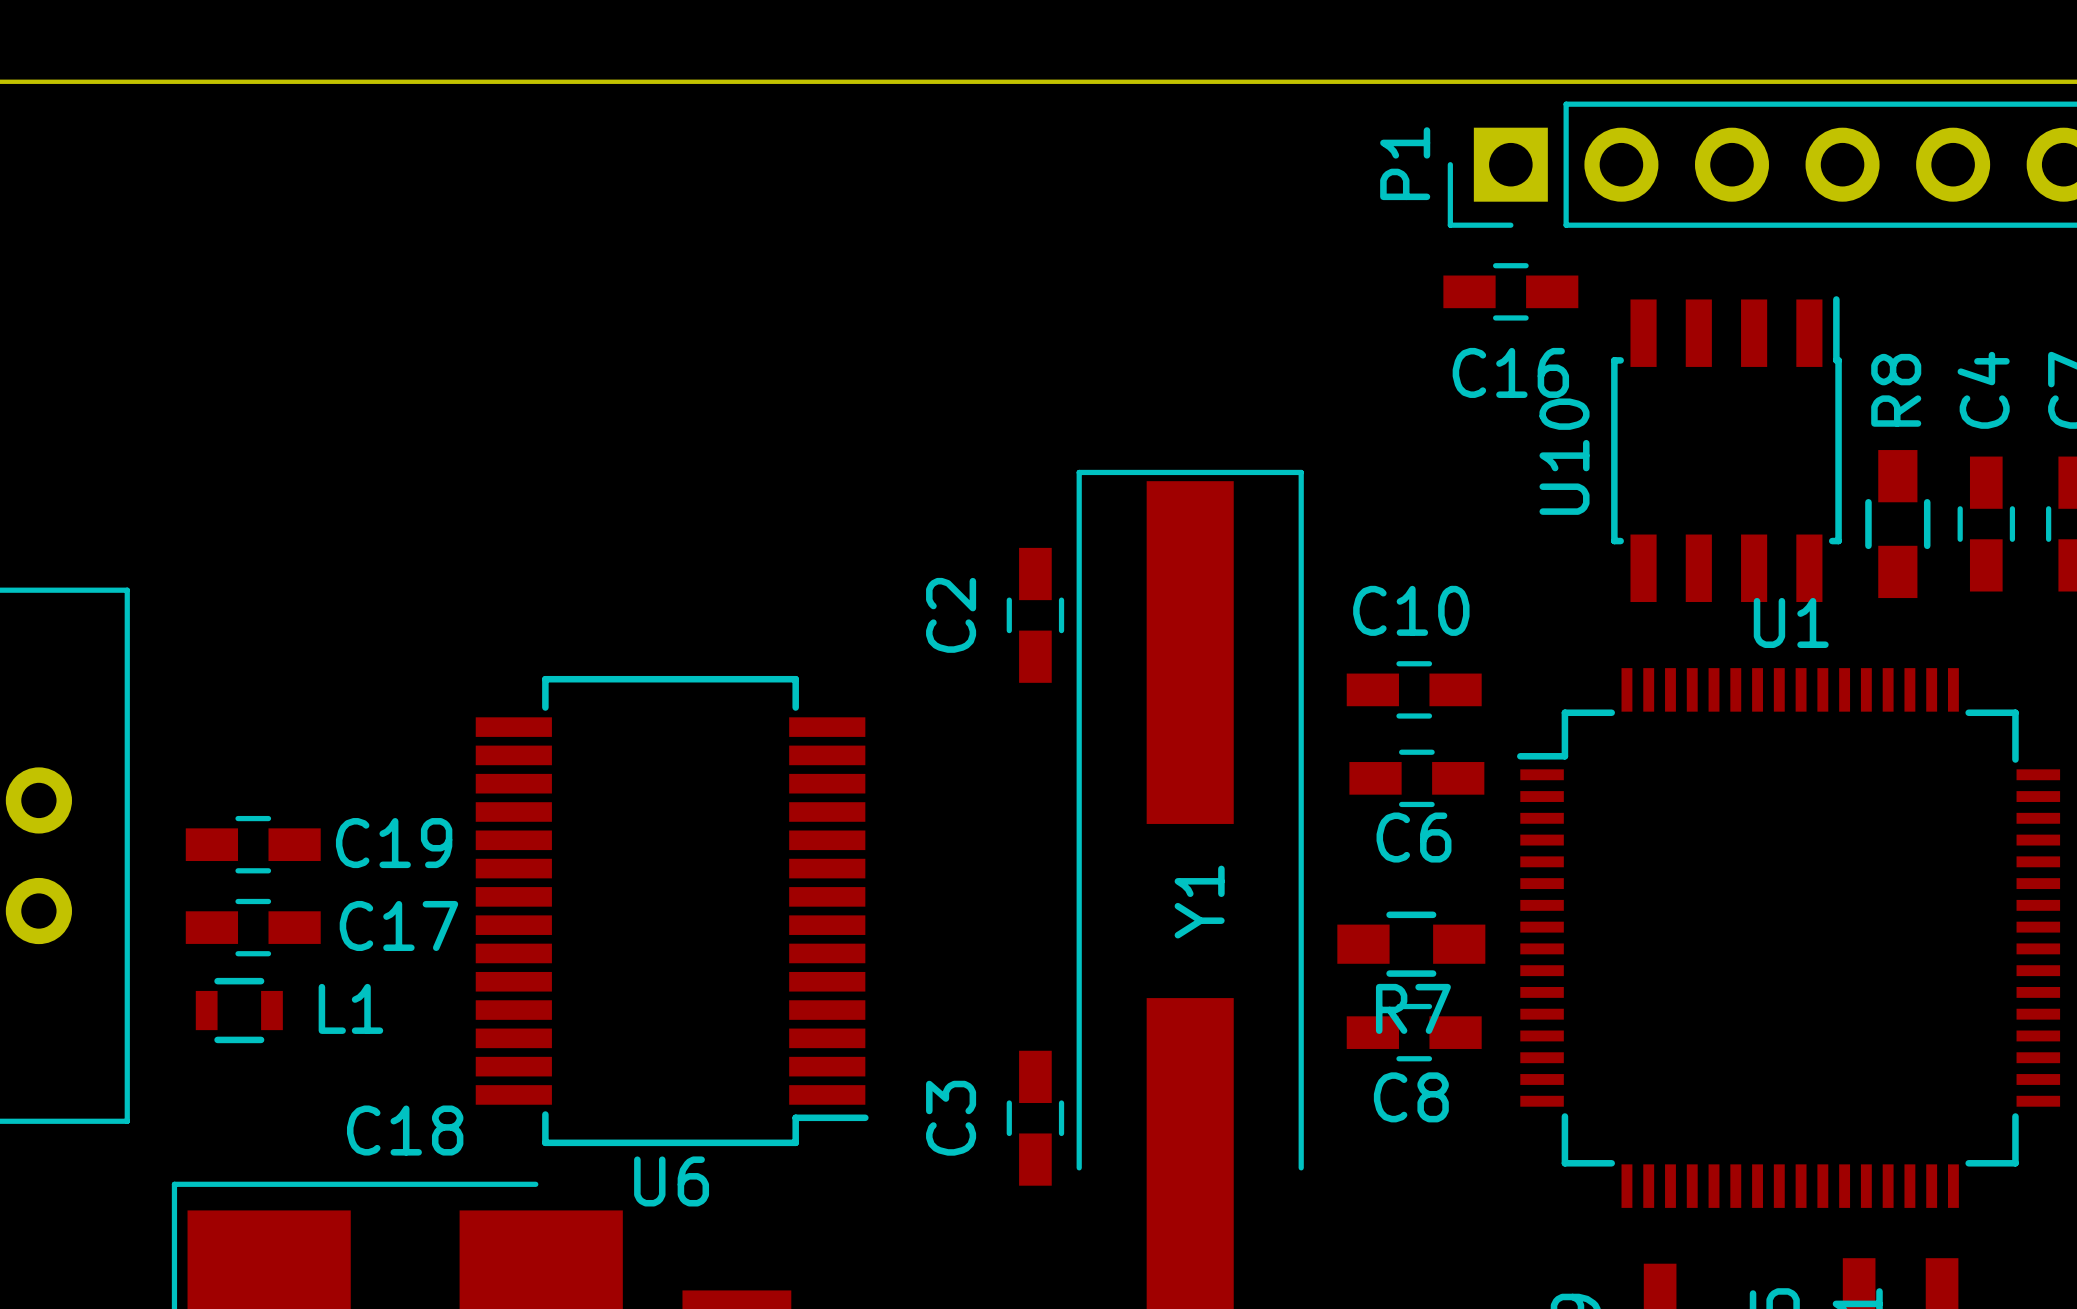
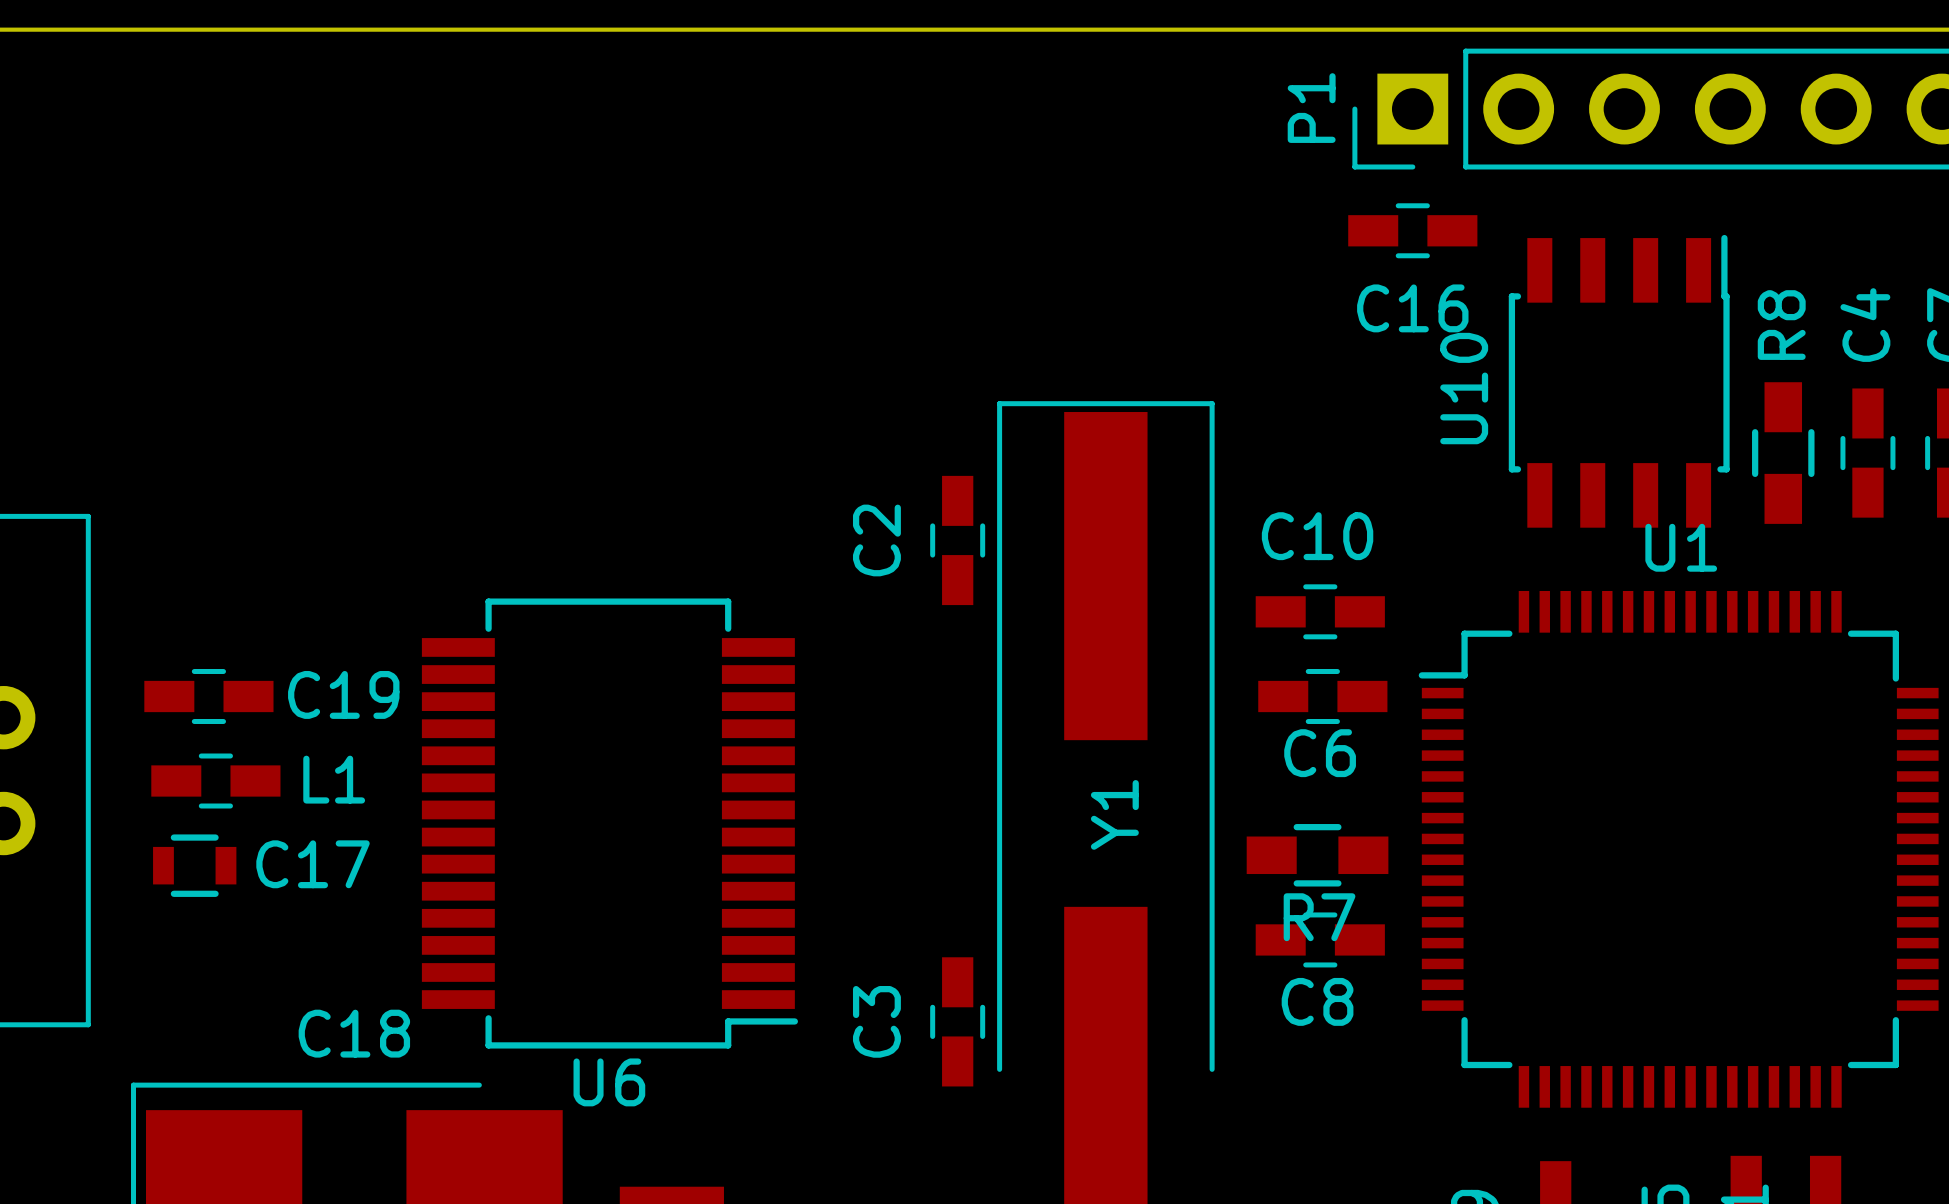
C19 position: (253, 844) -> (208, 696)
C17 name position: C17 (398, 925) -> C17 (313, 864)
C17 position: (253, 927) -> (215, 781)
L1 name position: L1 (350, 1008) -> L1 (334, 779)
L1 position: (239, 1010) -> (194, 865)

